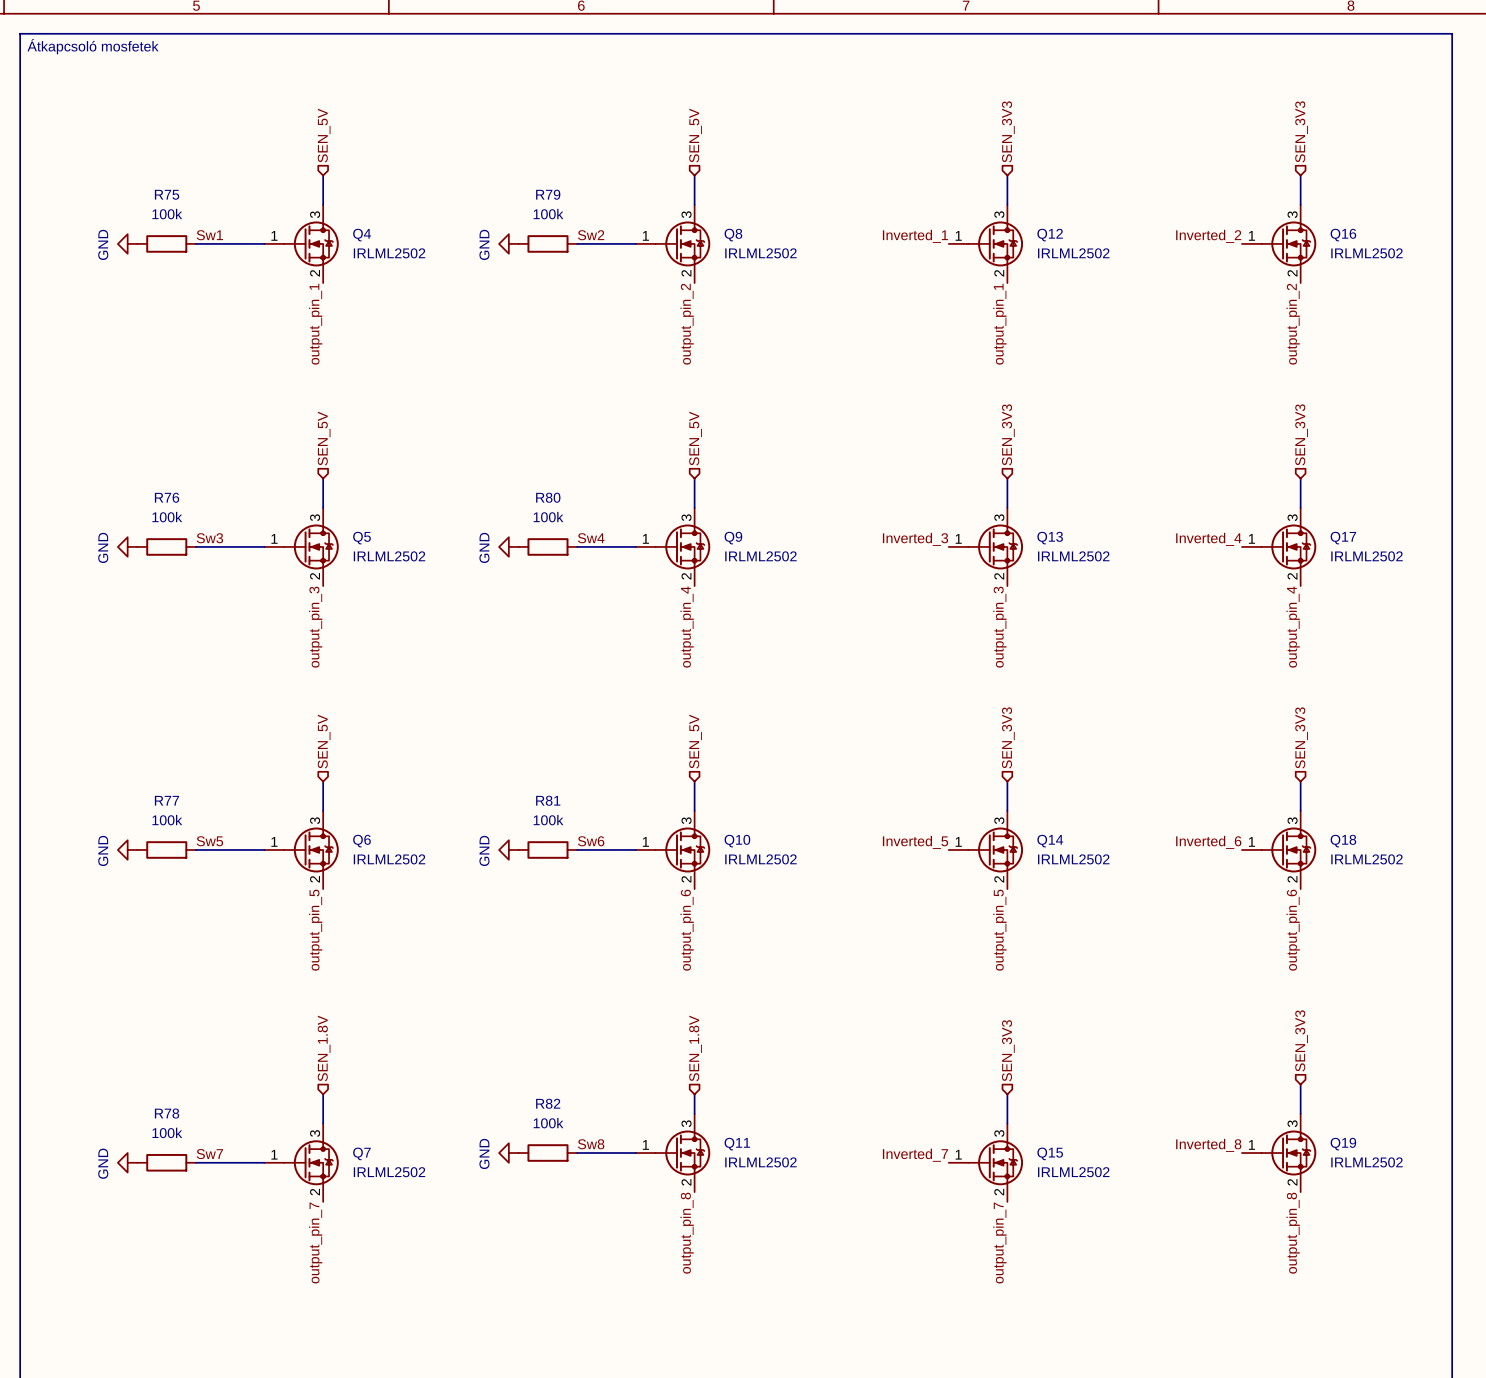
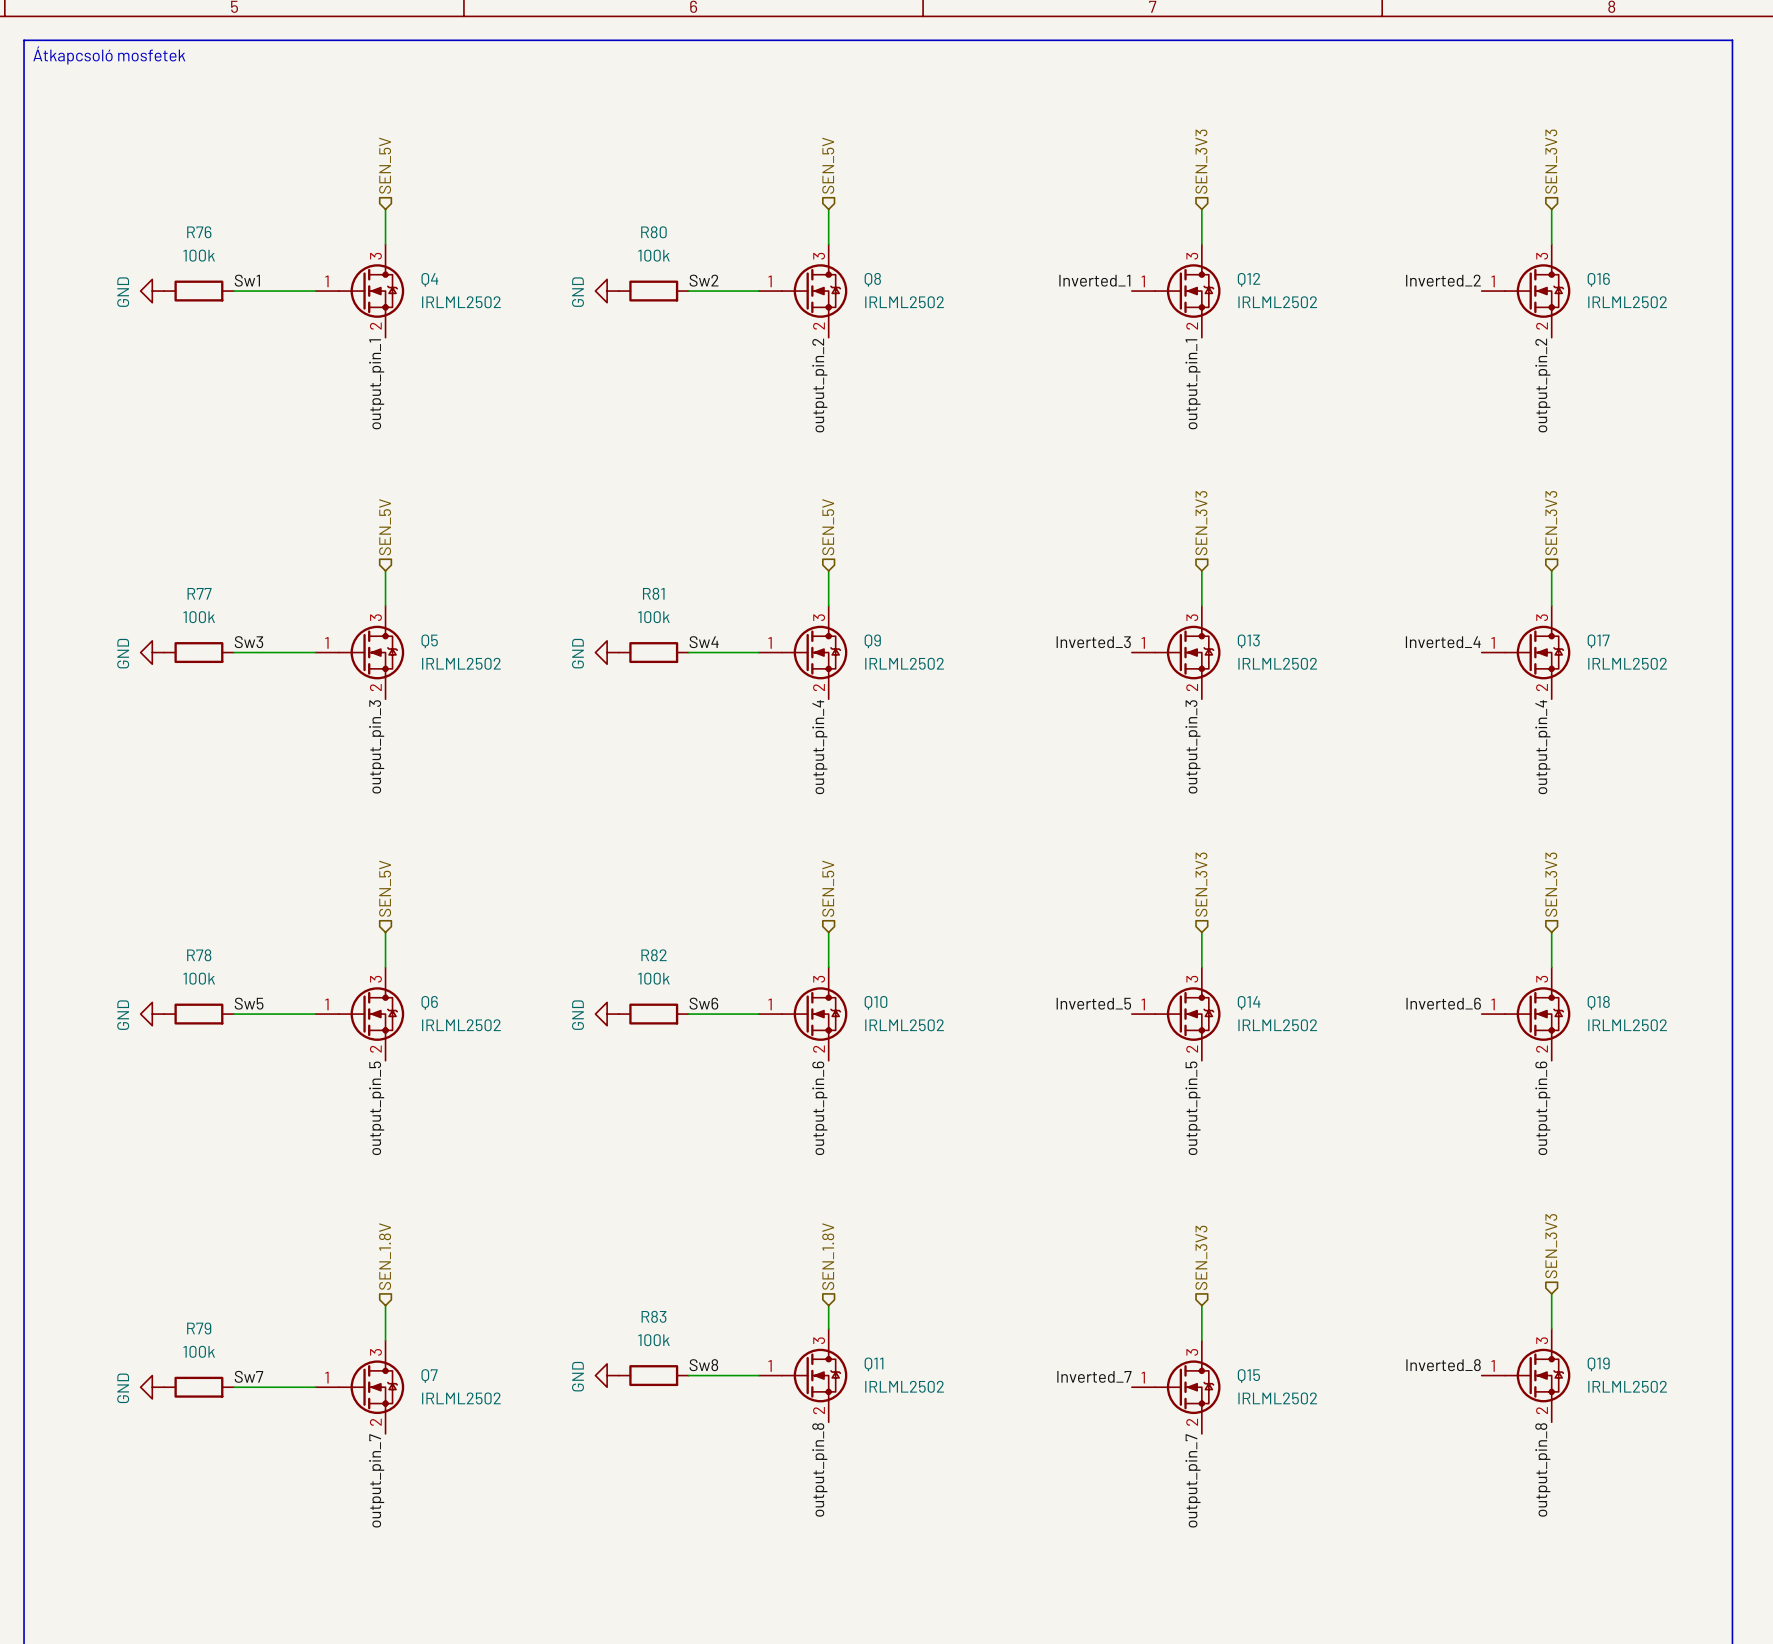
R75 name: R75 (167, 194) -> R76 (199, 232)
R79 name: R79 (548, 194) -> R80 (653, 232)
R76 name: R76 (167, 497) -> R77 (199, 593)
R80 name: R80 (548, 497) -> R81 (653, 593)
R77 name: R77 (166, 800) -> R78 (199, 955)
R81 name: R81 (548, 800) -> R82 (654, 955)
R82 name: R82 (548, 1103) -> R83 (653, 1316)
R78 name: R78 (167, 1113) -> R79 (199, 1328)

